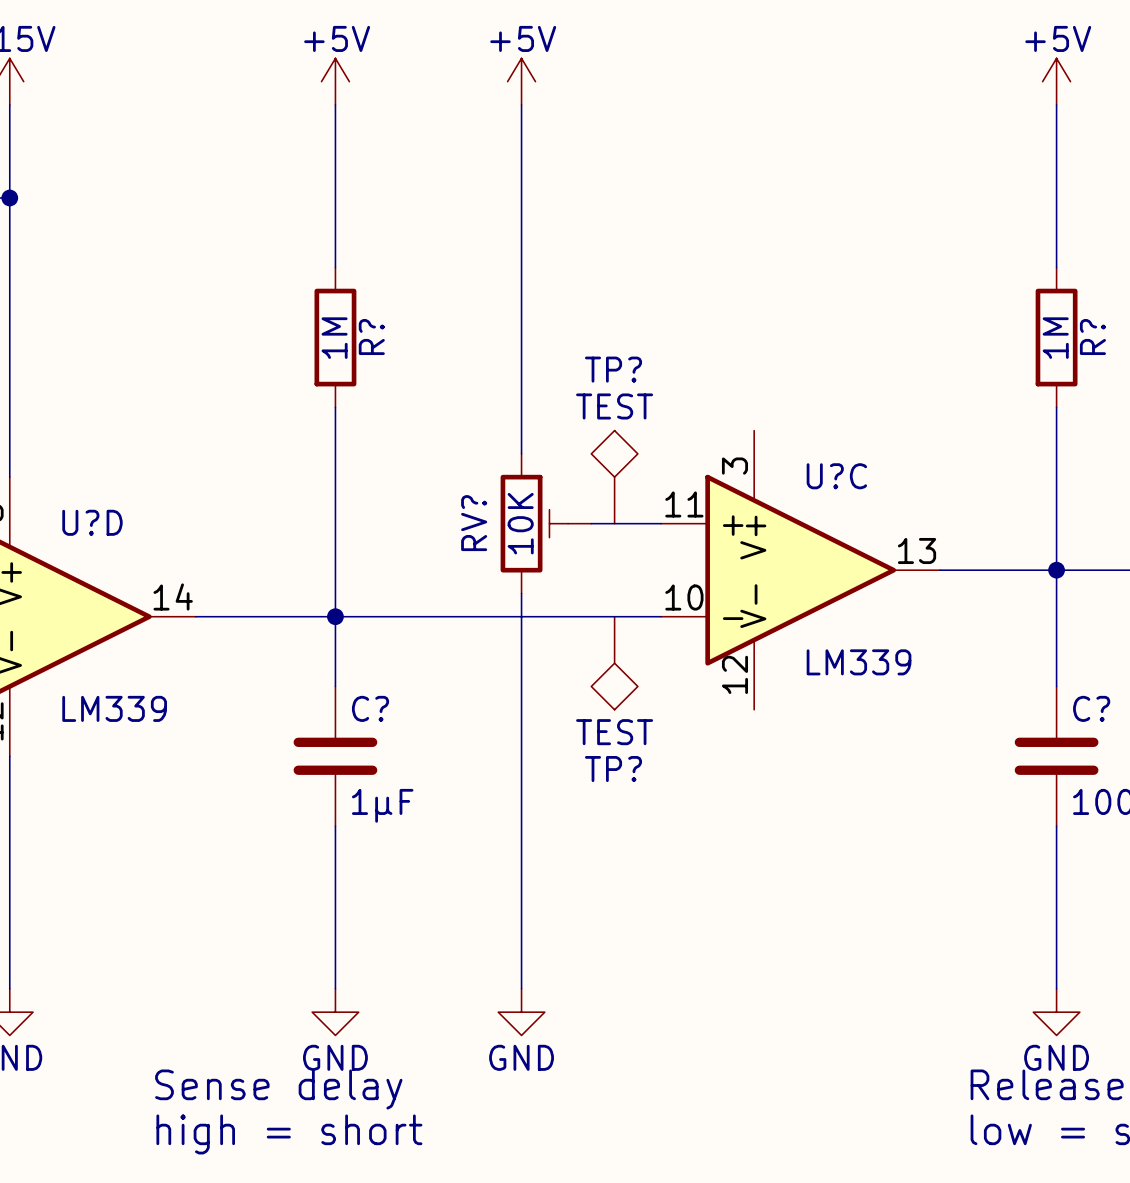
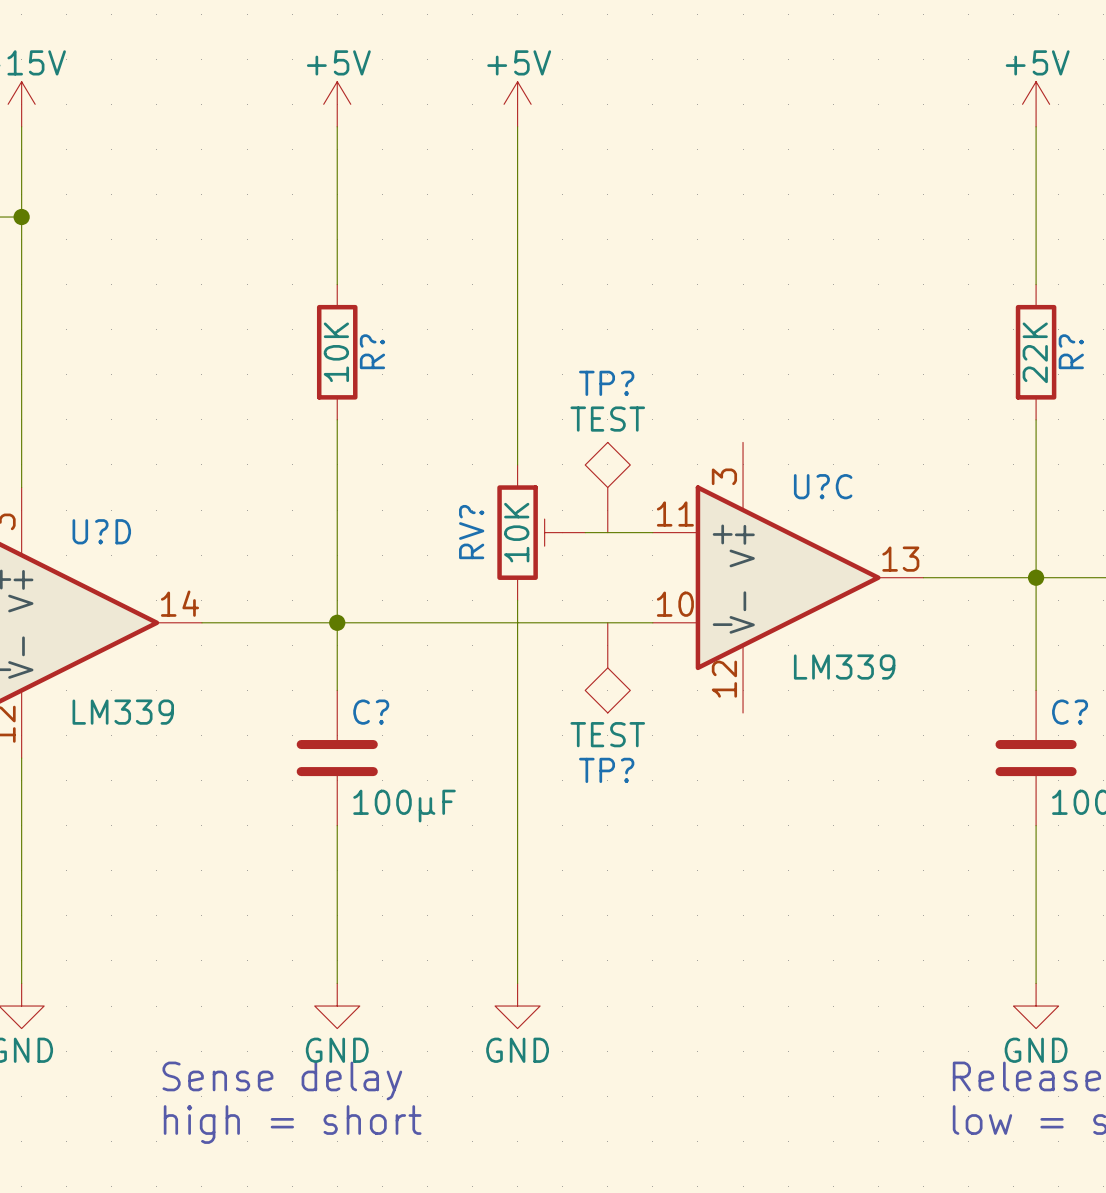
R? value: 1M (334, 338) -> 10K (336, 352)
R? value: 1M (1055, 338) -> 22K (1035, 352)
C? value: 1µF (382, 805) -> 100µF (404, 806)

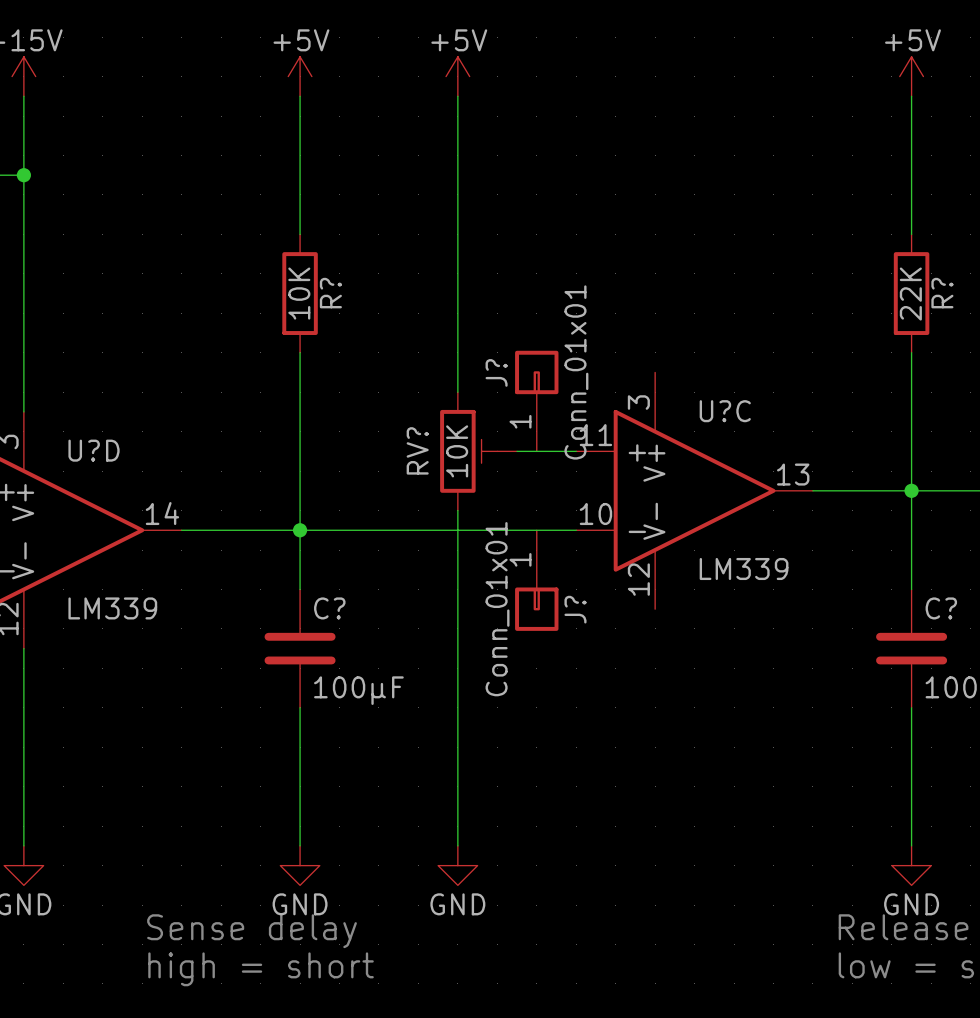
J?: none -> Conn_01x01 (536, 401)
TP?: TEST (607, 487) -> none
TP?: TEST (607, 667) -> none
J?: none -> Conn_01x01 (536, 580)

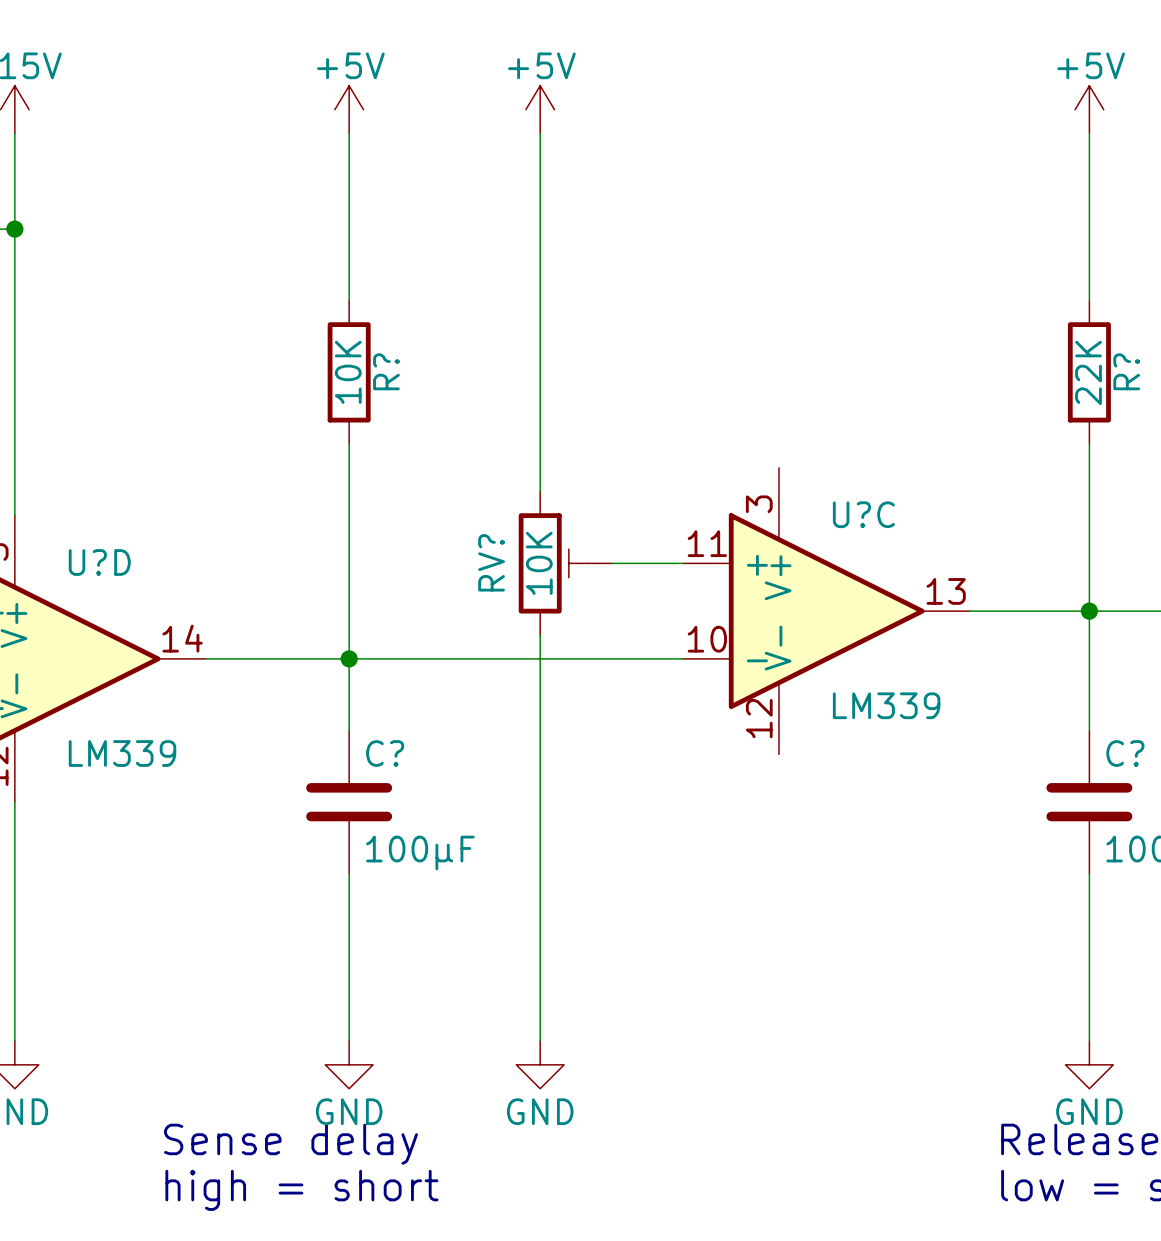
J?: Conn_01x01 (536, 401) -> none
J?: Conn_01x01 (536, 580) -> none

